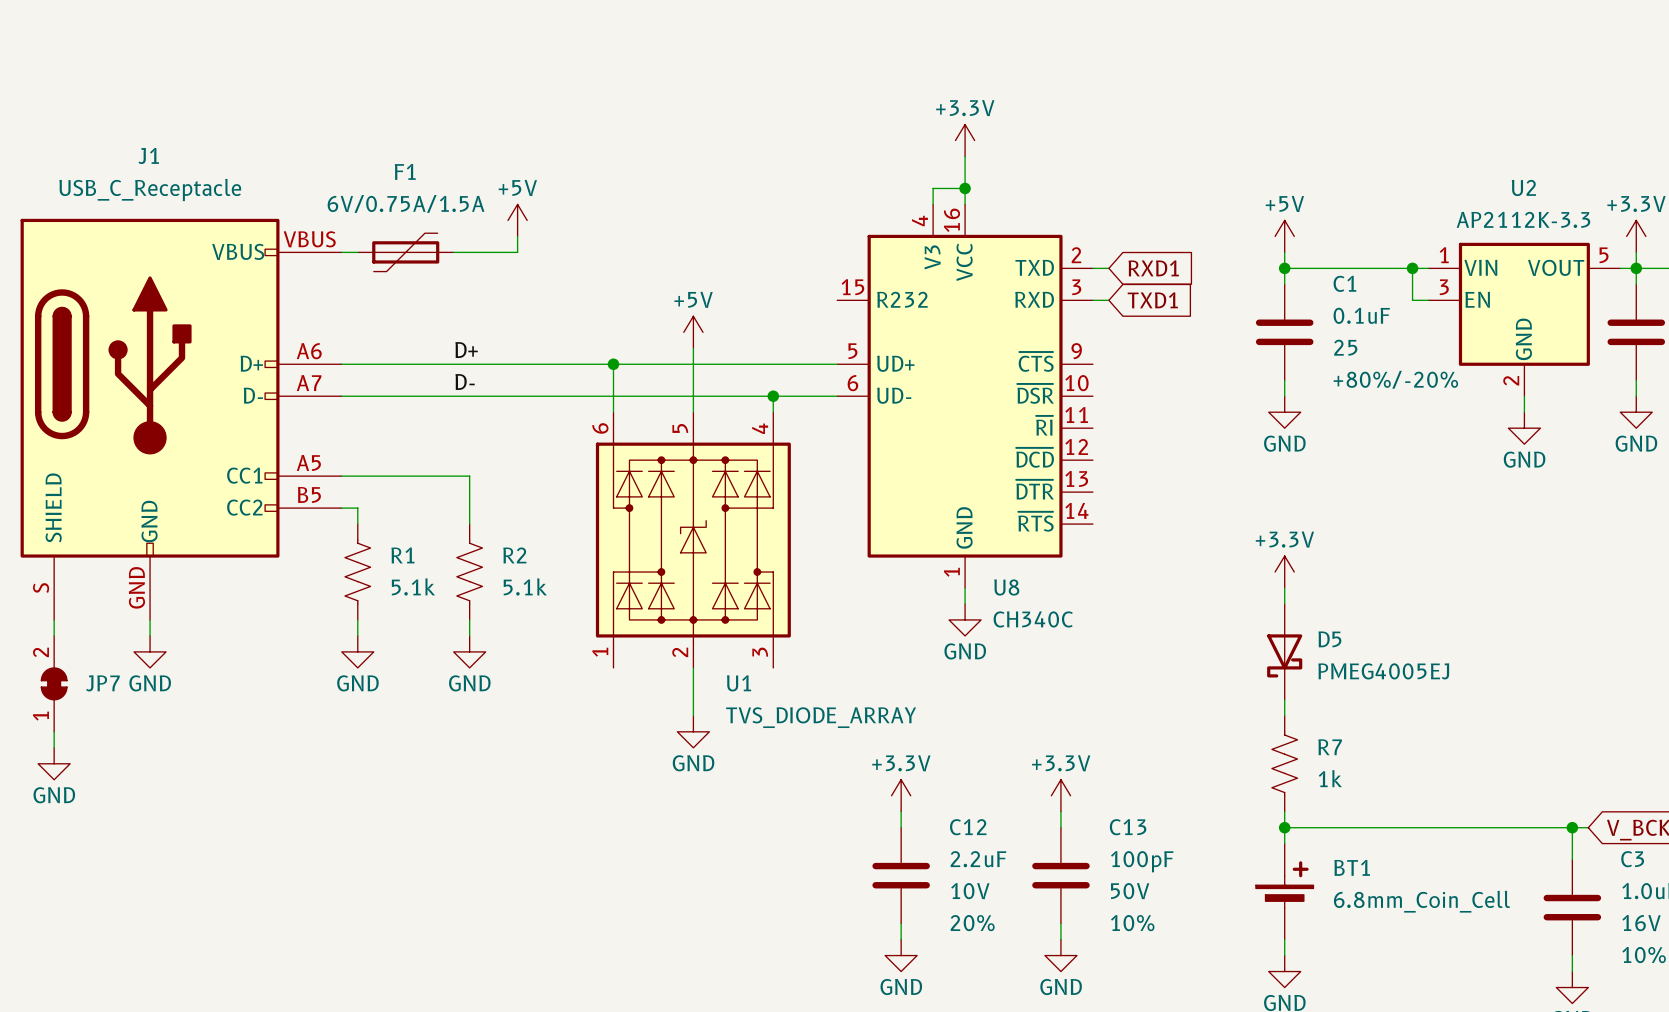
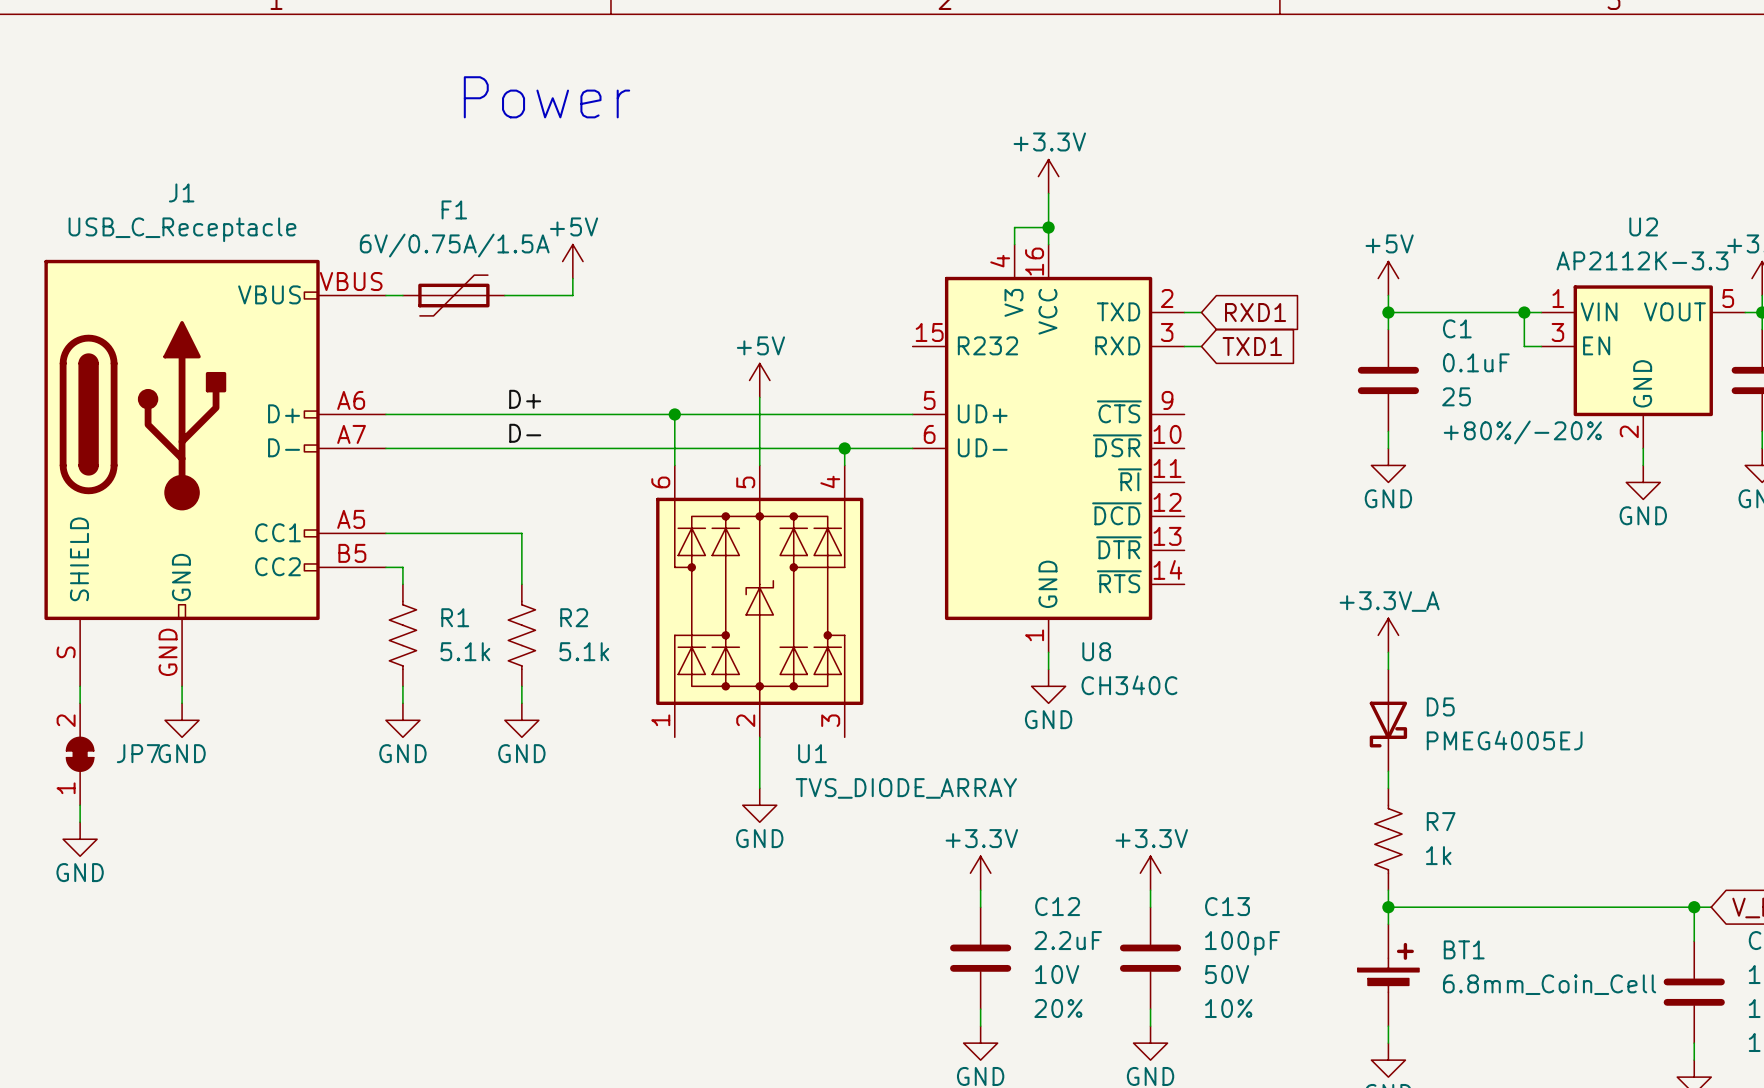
text: none -> Power (546, 97)
power symbol: +3.3V (1284, 572) -> +3.3V_A (1388, 635)

